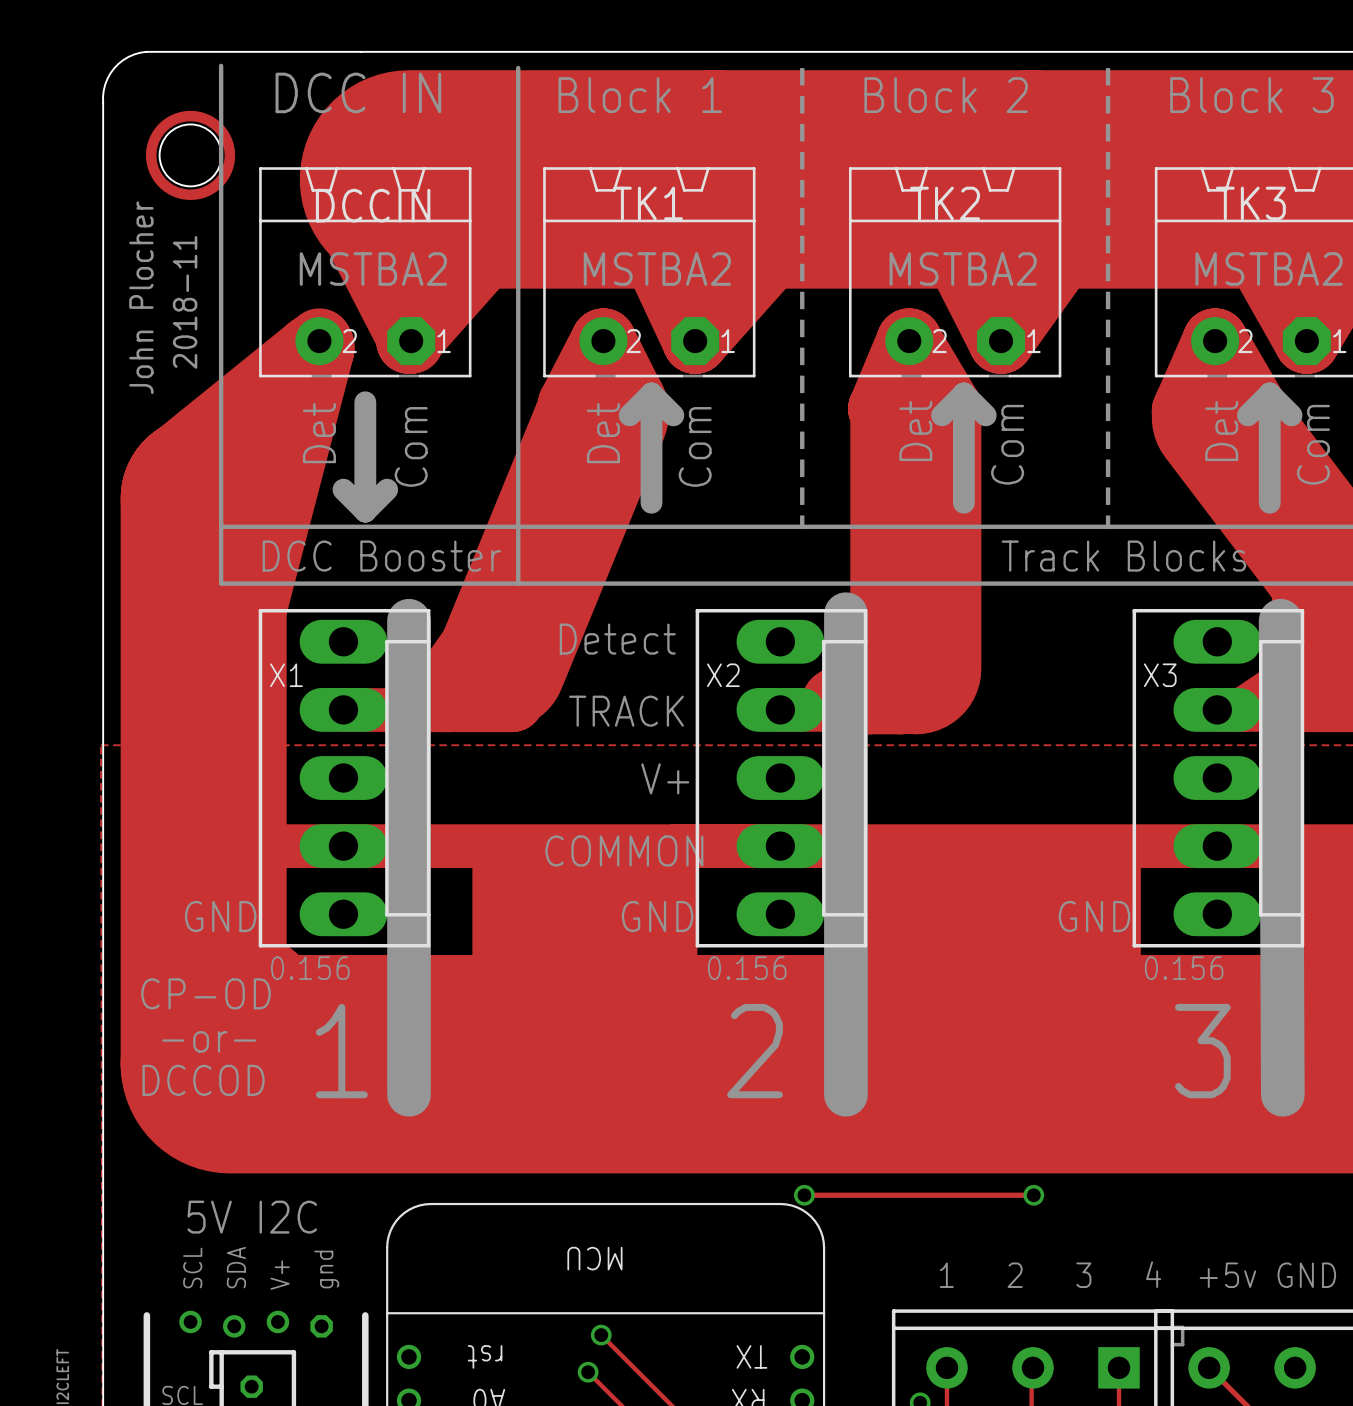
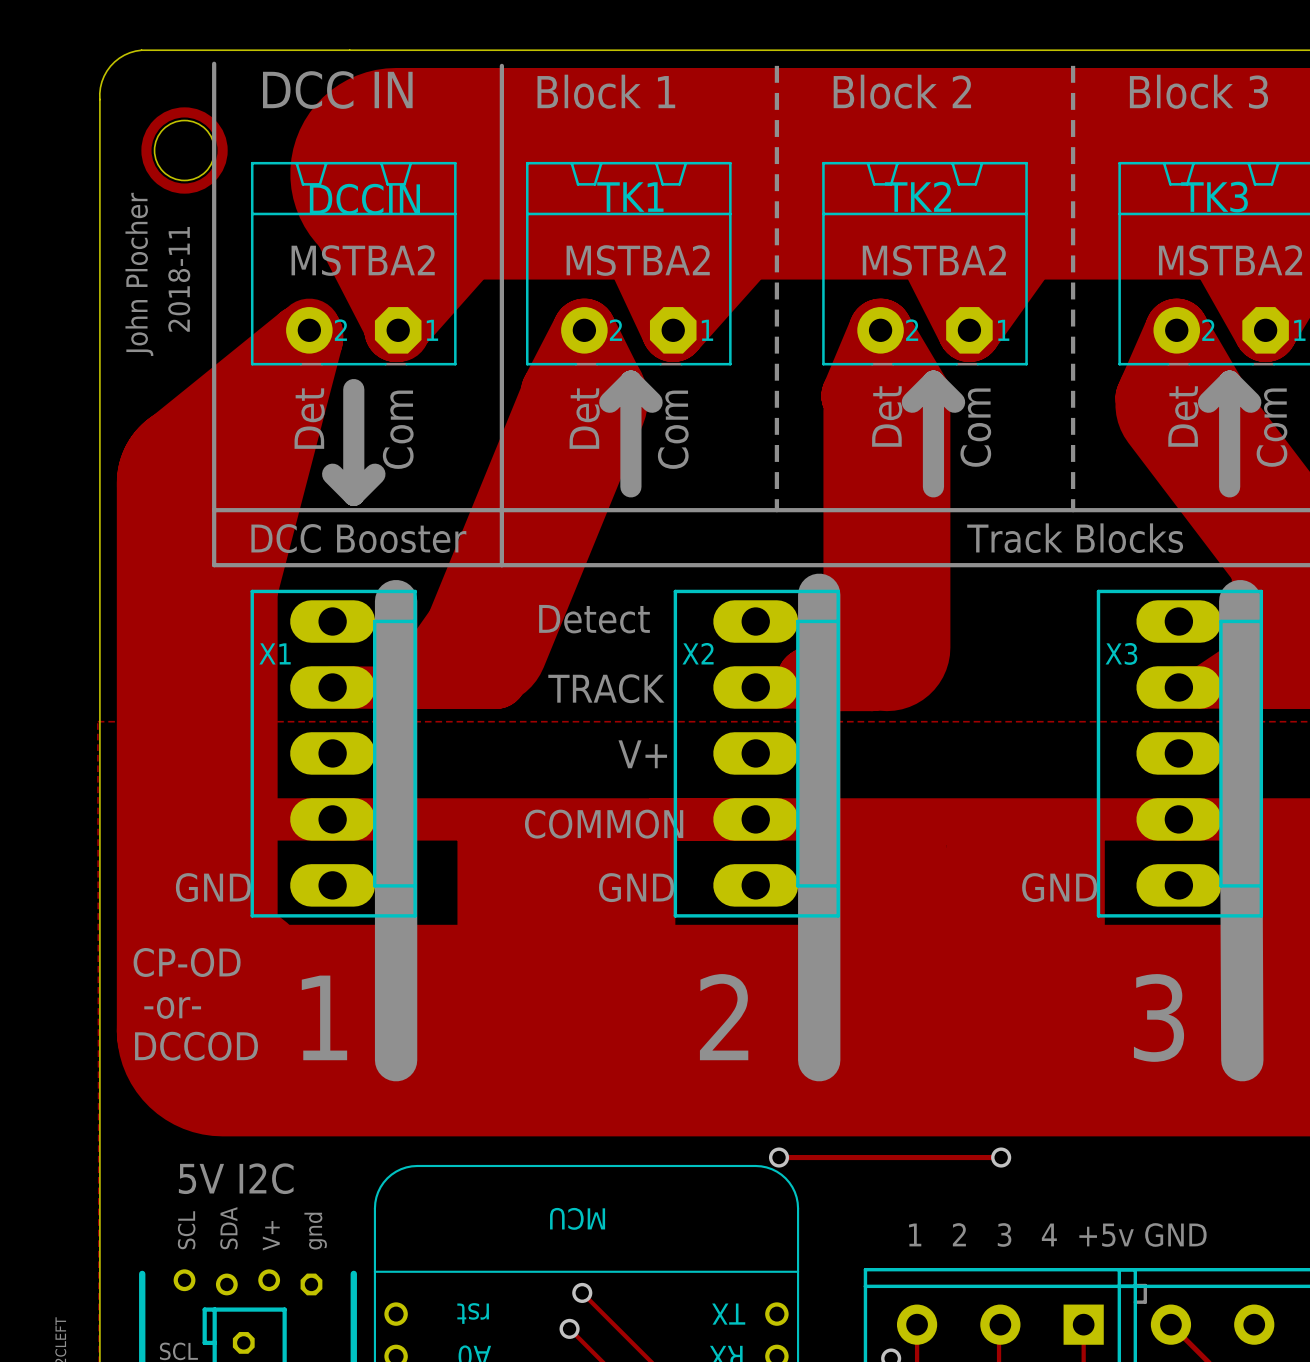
X1 value: 0.156 (310, 968) -> none
X2 value: 0.156 (747, 968) -> none
X3 value: 0.156 (1184, 968) -> none

